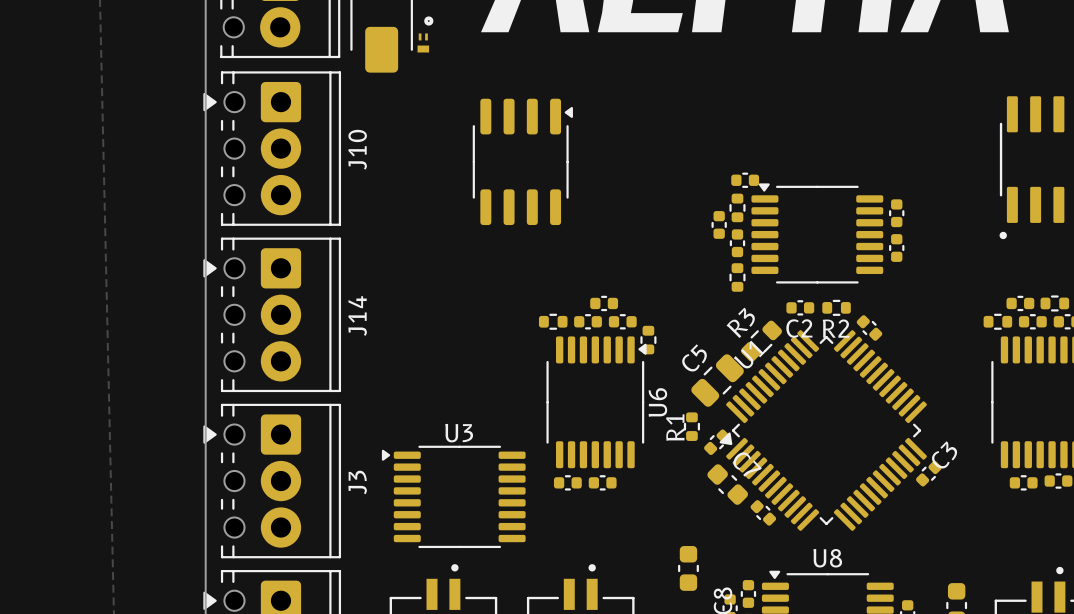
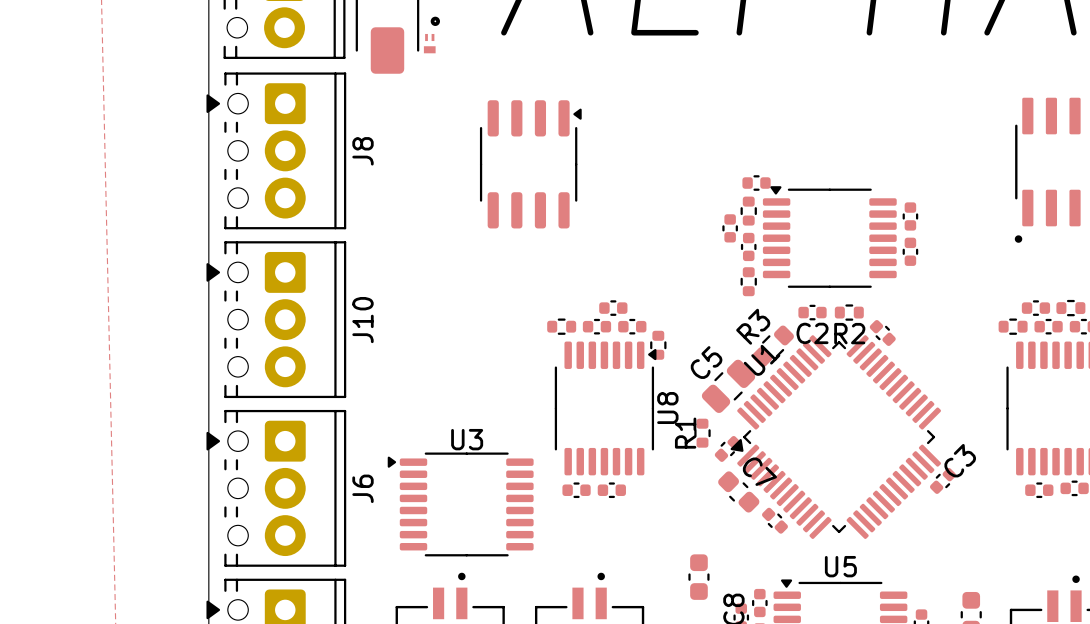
J10 name: J10 (357, 149) -> J8 (363, 151)
J14 name: J14 (357, 316) -> J10 (363, 320)
U6 name: U6 (657, 402) -> U8 (667, 408)
J3 name: J3 (357, 482) -> J6 (363, 488)
U8 name: U8 (827, 558) -> U5 (840, 566)

